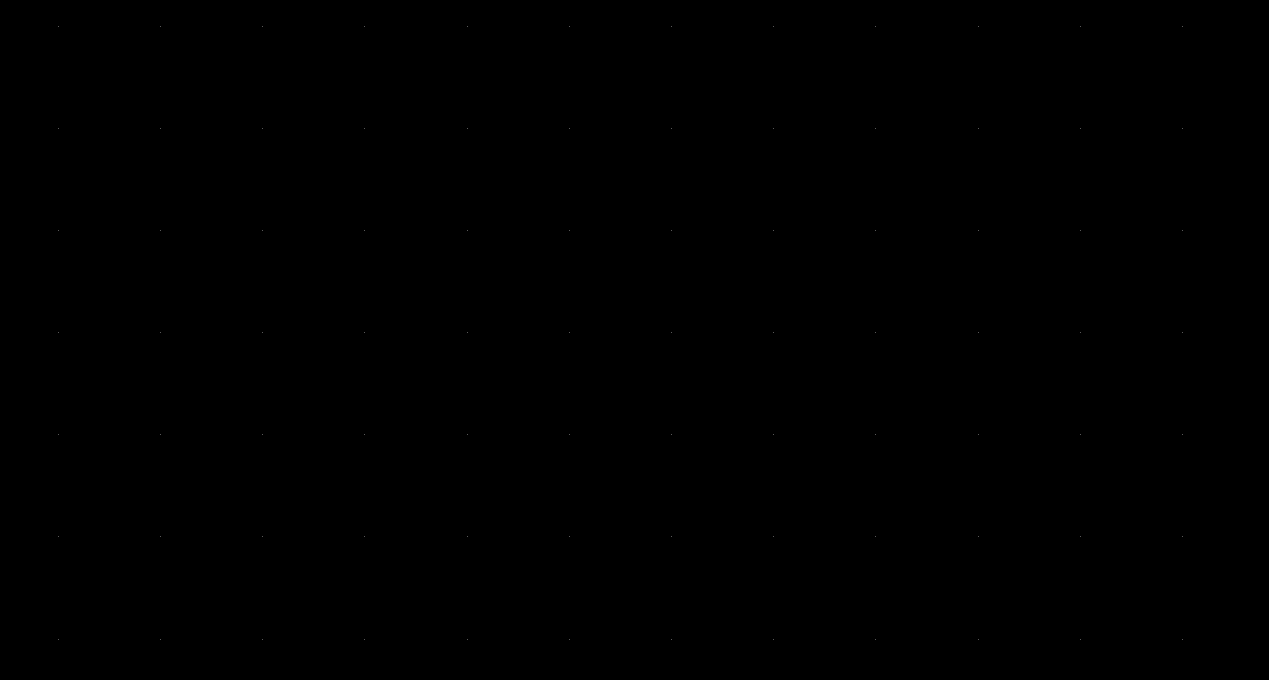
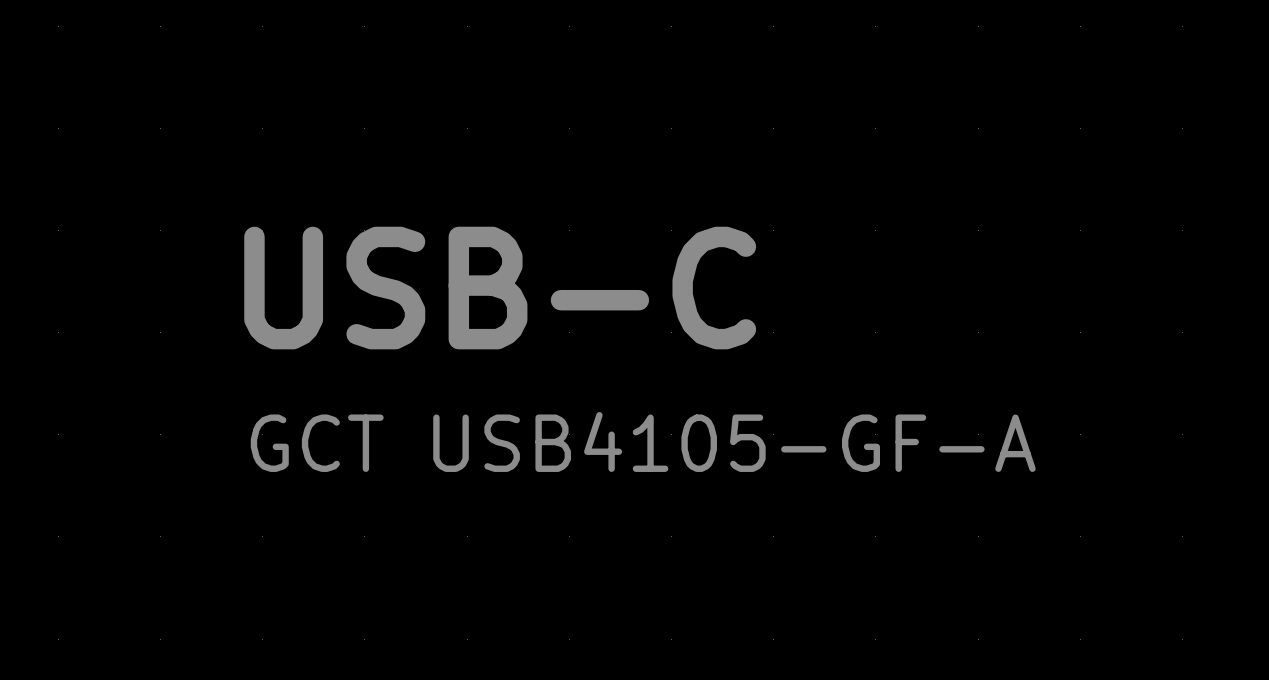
text: none -> USB-C (500, 288)
text: none -> GCT USB4105-GF-A (643, 442)

